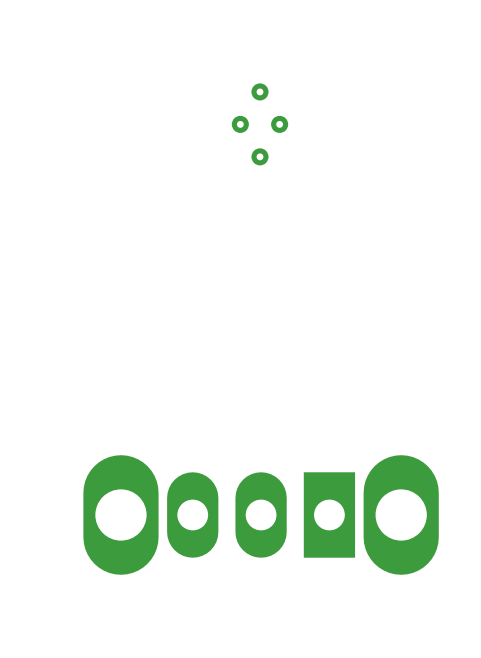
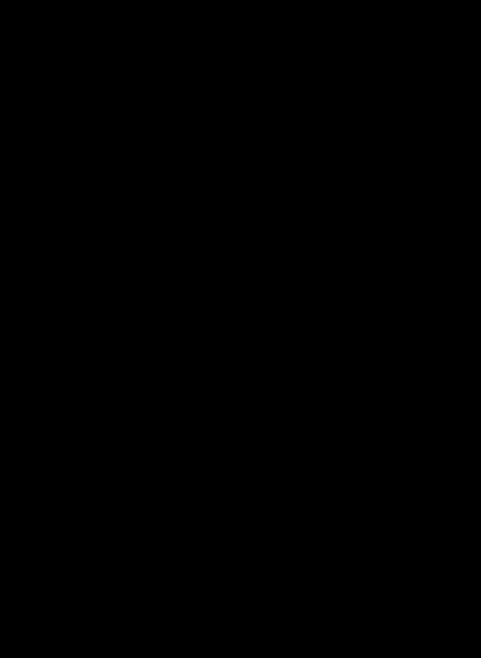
part: (259, 124) -> none
part: (261, 514) -> none

